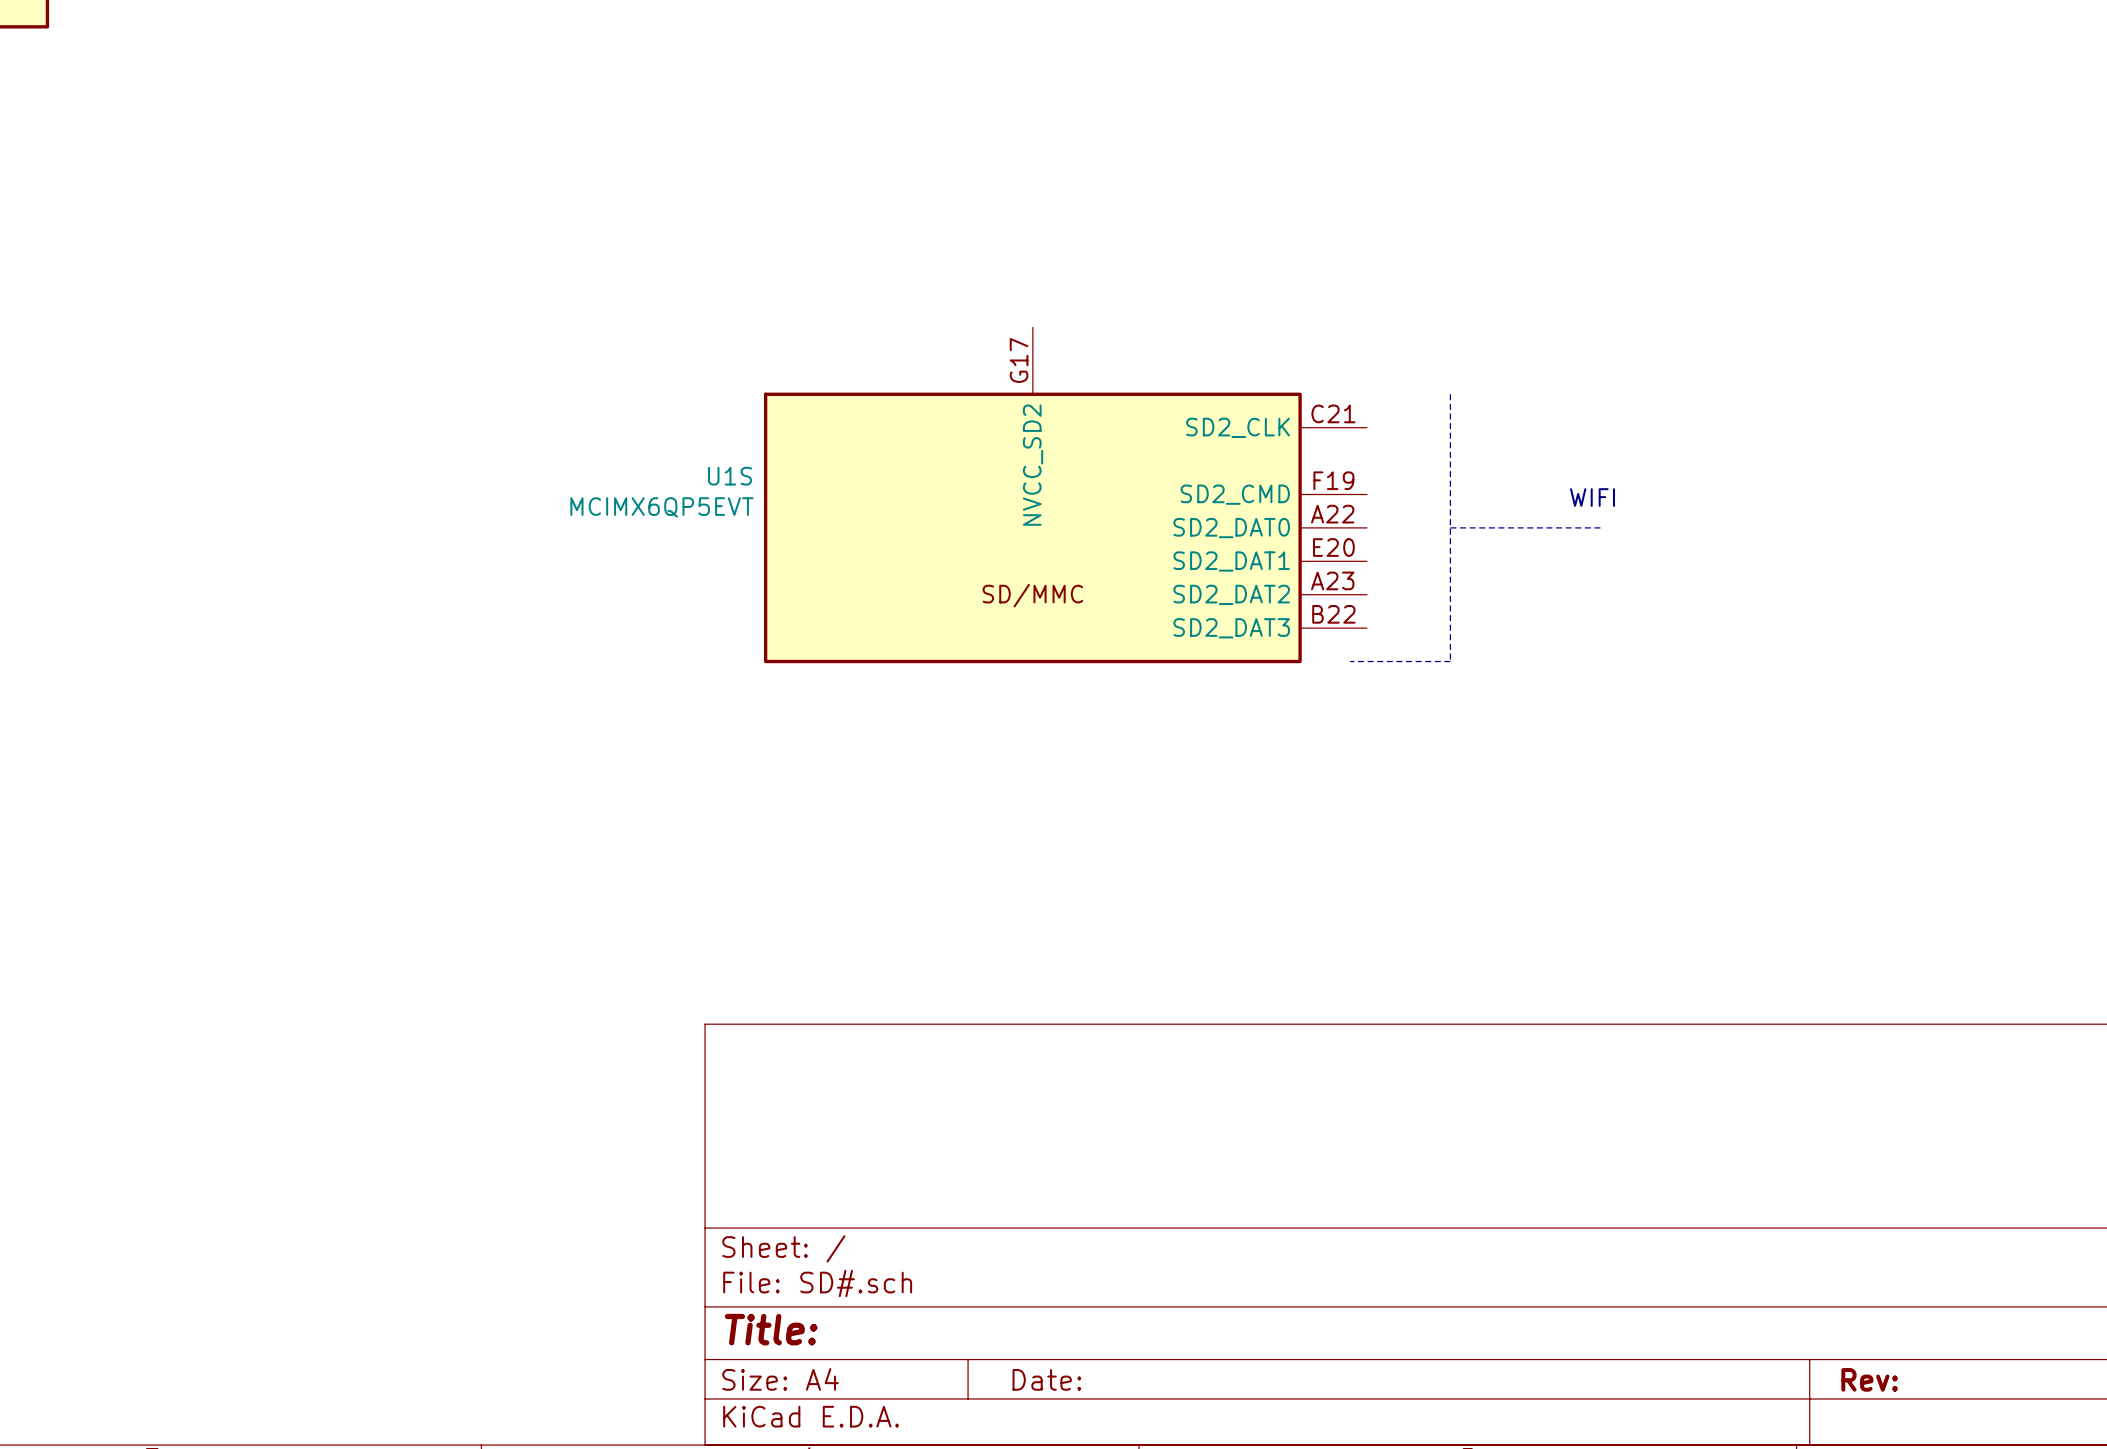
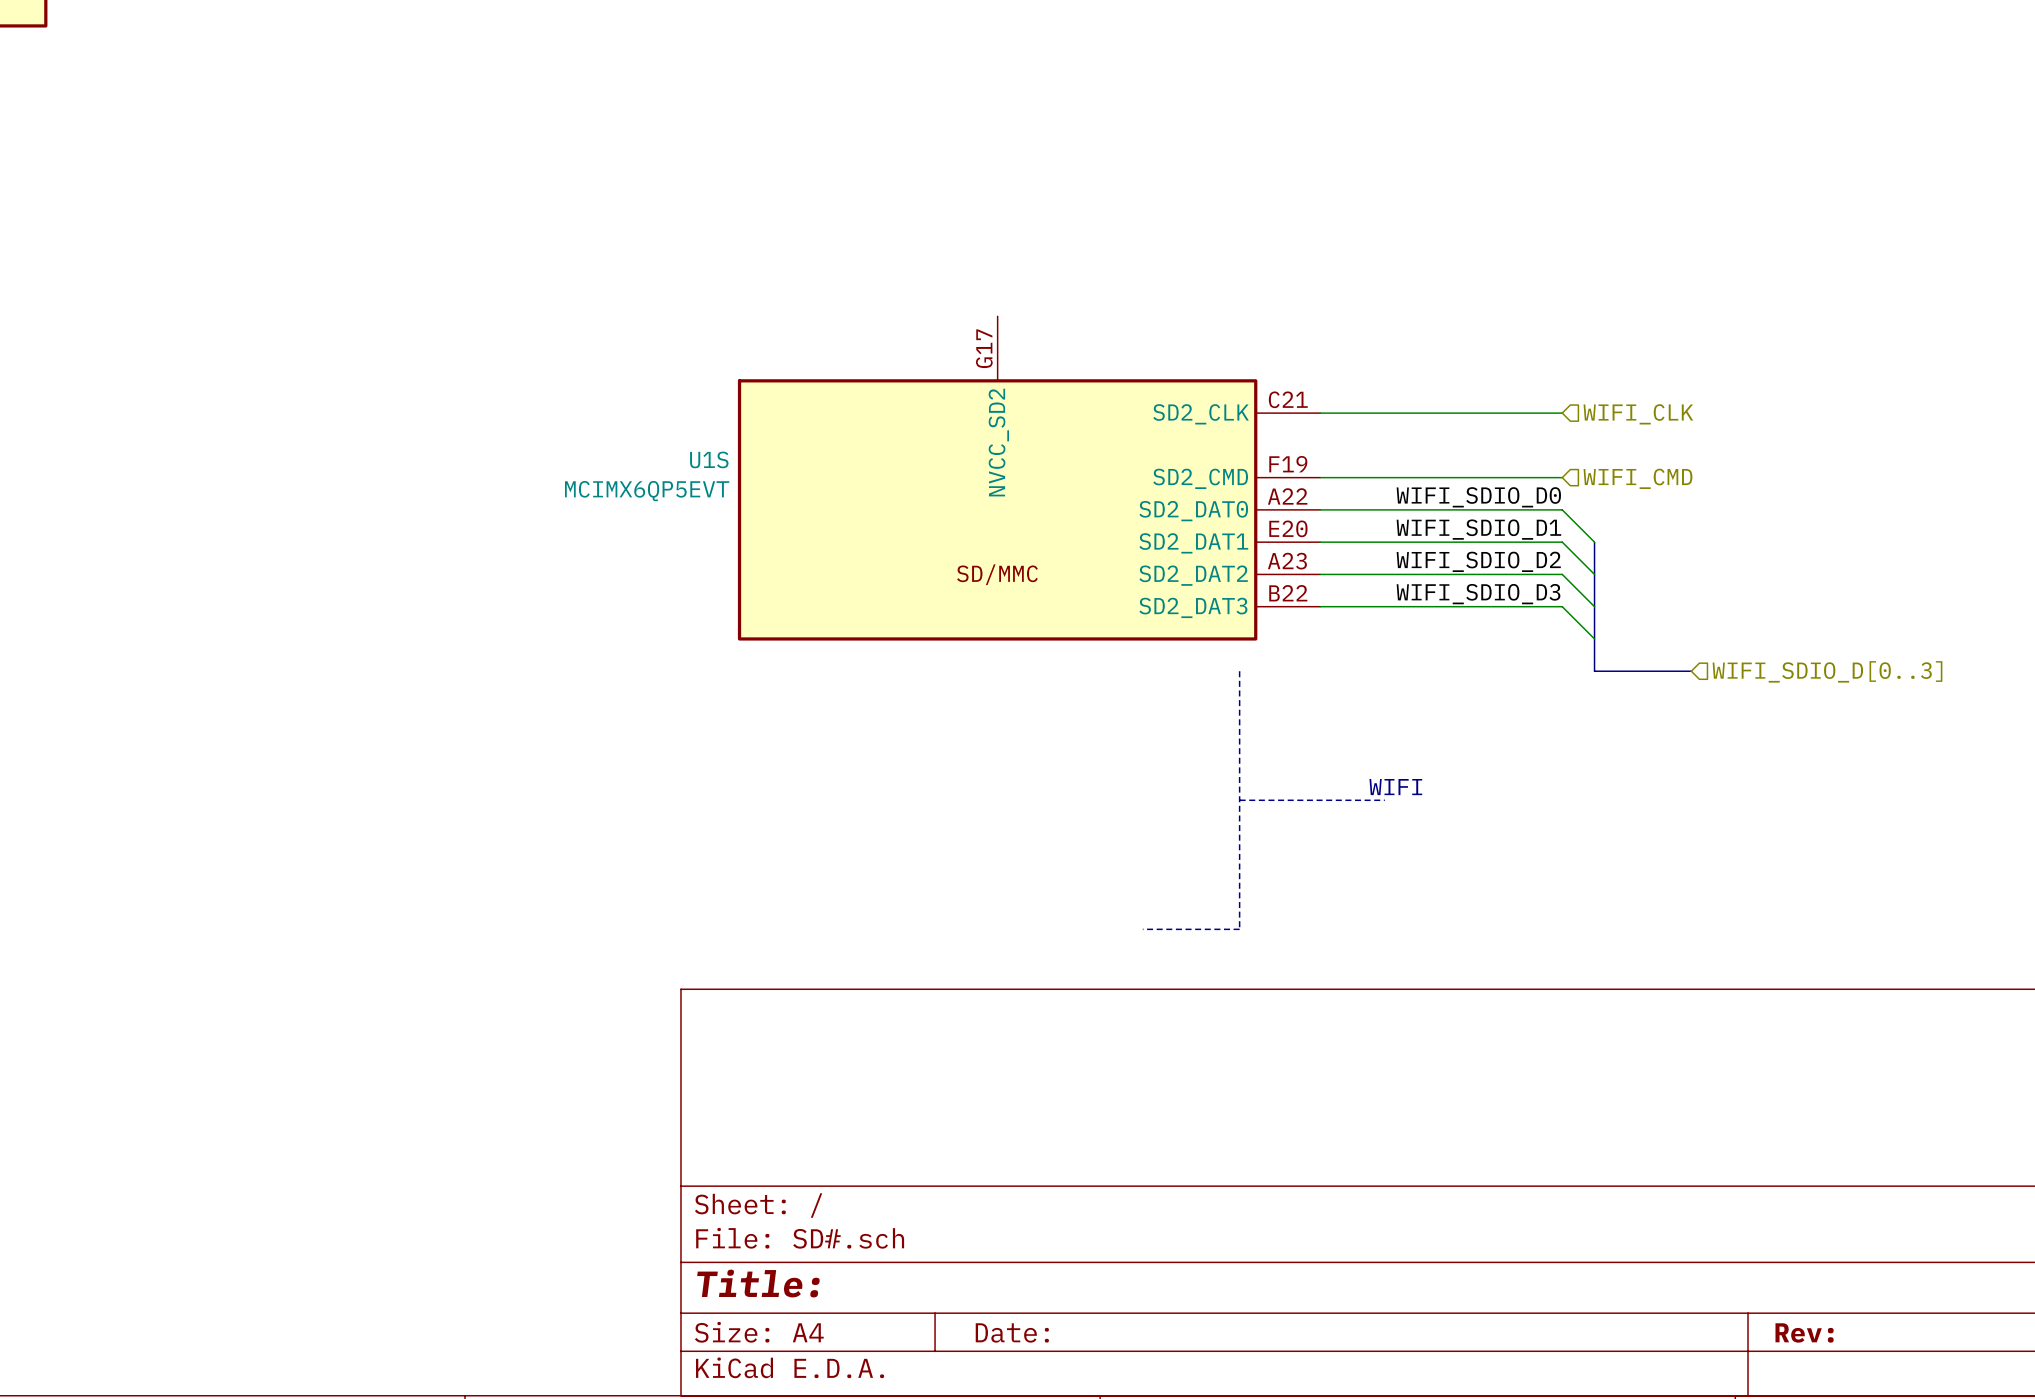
line: (1450, 394) (1450, 661) (1350, 661) -> none
wire: none -> (1320, 413) (1562, 413)
hierarchical label: none -> WIFI_CLK (1638, 414)
wire: none -> (1320, 477) (1562, 477)
hierarchical label: none -> WIFI_CMD (1637, 478)
text: WIFI (1592, 497) -> none
label: none -> WIFI_SDIO_D0 (1478, 497)
wire: none -> (1320, 509) (1562, 509) (1594, 542)
line: (1450, 527) (1600, 527) -> none
label: none -> WIFI_SDIO_D1 (1478, 529)
wire: none -> (1320, 542) (1562, 542) (1594, 574)
bus: none -> (1594, 542) (1594, 671) (1691, 671)
label: none -> WIFI_SDIO_D2 (1478, 561)
wire: none -> (1320, 574) (1562, 574) (1594, 606)
label: none -> WIFI_SDIO_D3 (1478, 594)
wire: none -> (1320, 606) (1562, 606) (1594, 638)
line: none -> (1239, 671) (1239, 929) (1142, 929)
hierarchical label: none -> WIFI_SDIO_D[0..3] (1827, 671)
text: none -> WIFI (1395, 787)
line: none -> (1239, 800) (1384, 800)

